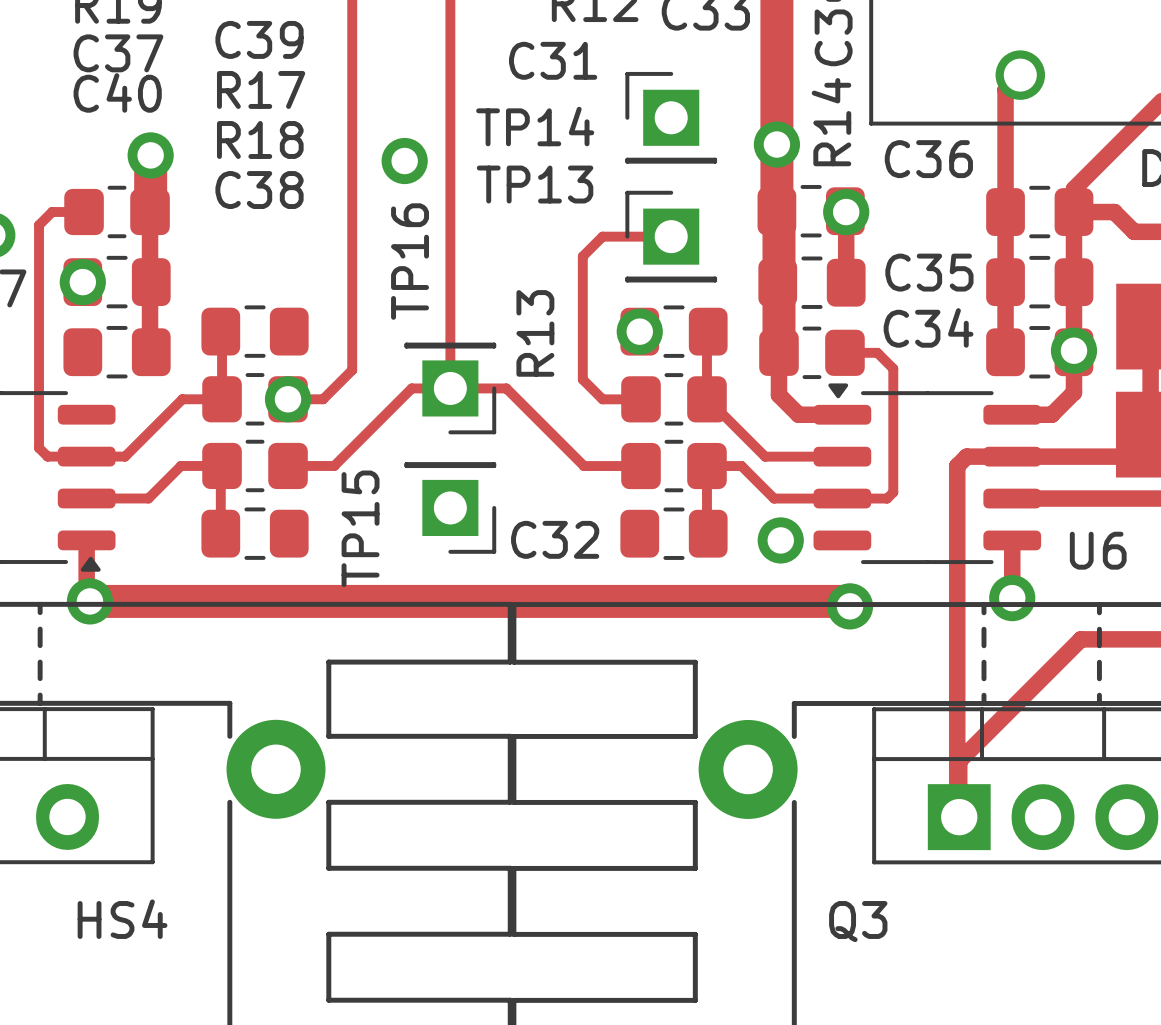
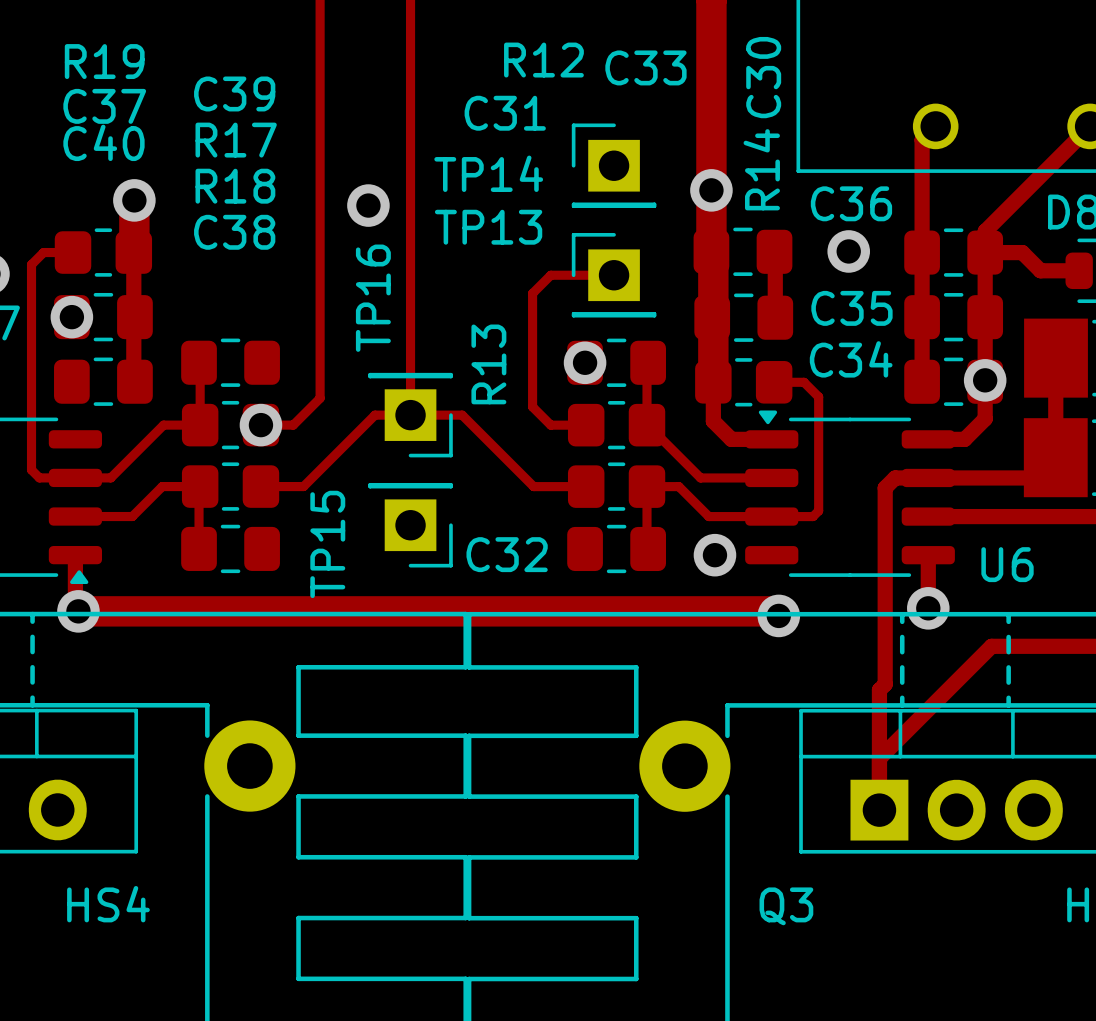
via position: (846, 212) -> (848, 251)
track: (976, 456) (966, 456) (957, 466) (957, 815) -> (895, 477) (885, 487) (885, 684) (879, 690) (879, 758)

